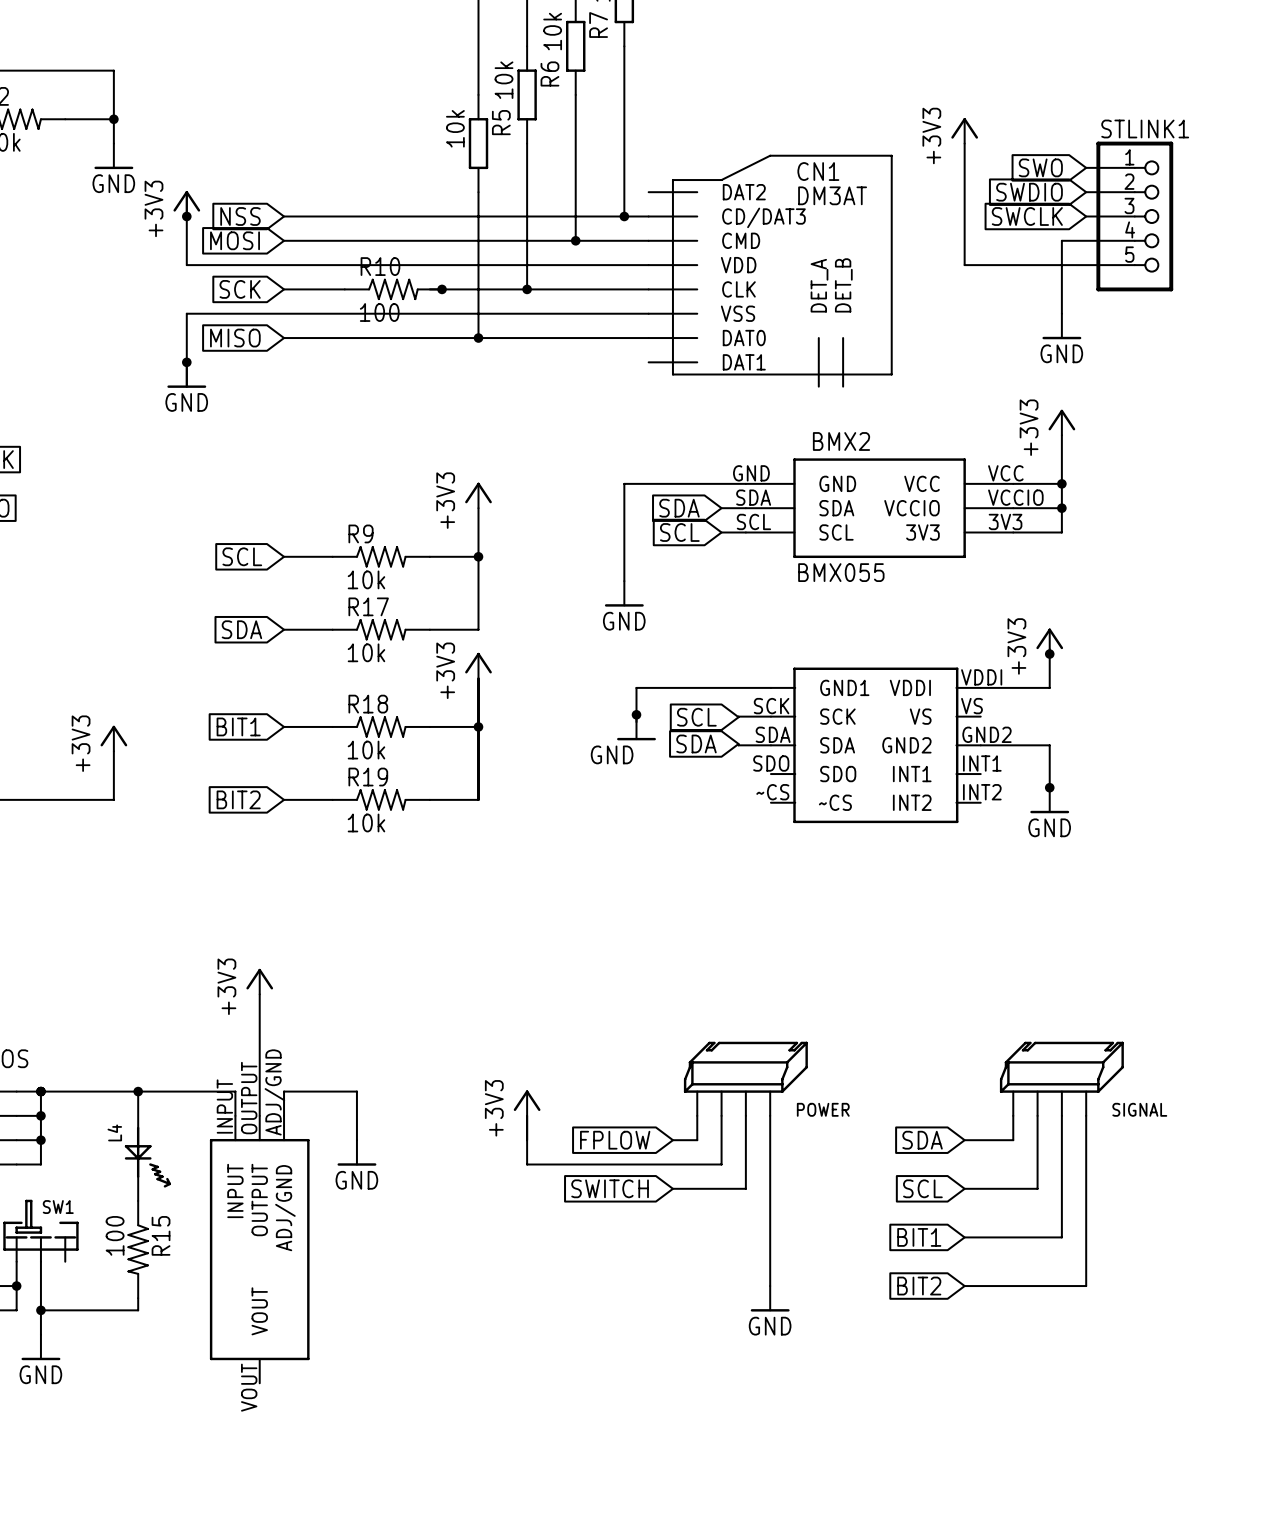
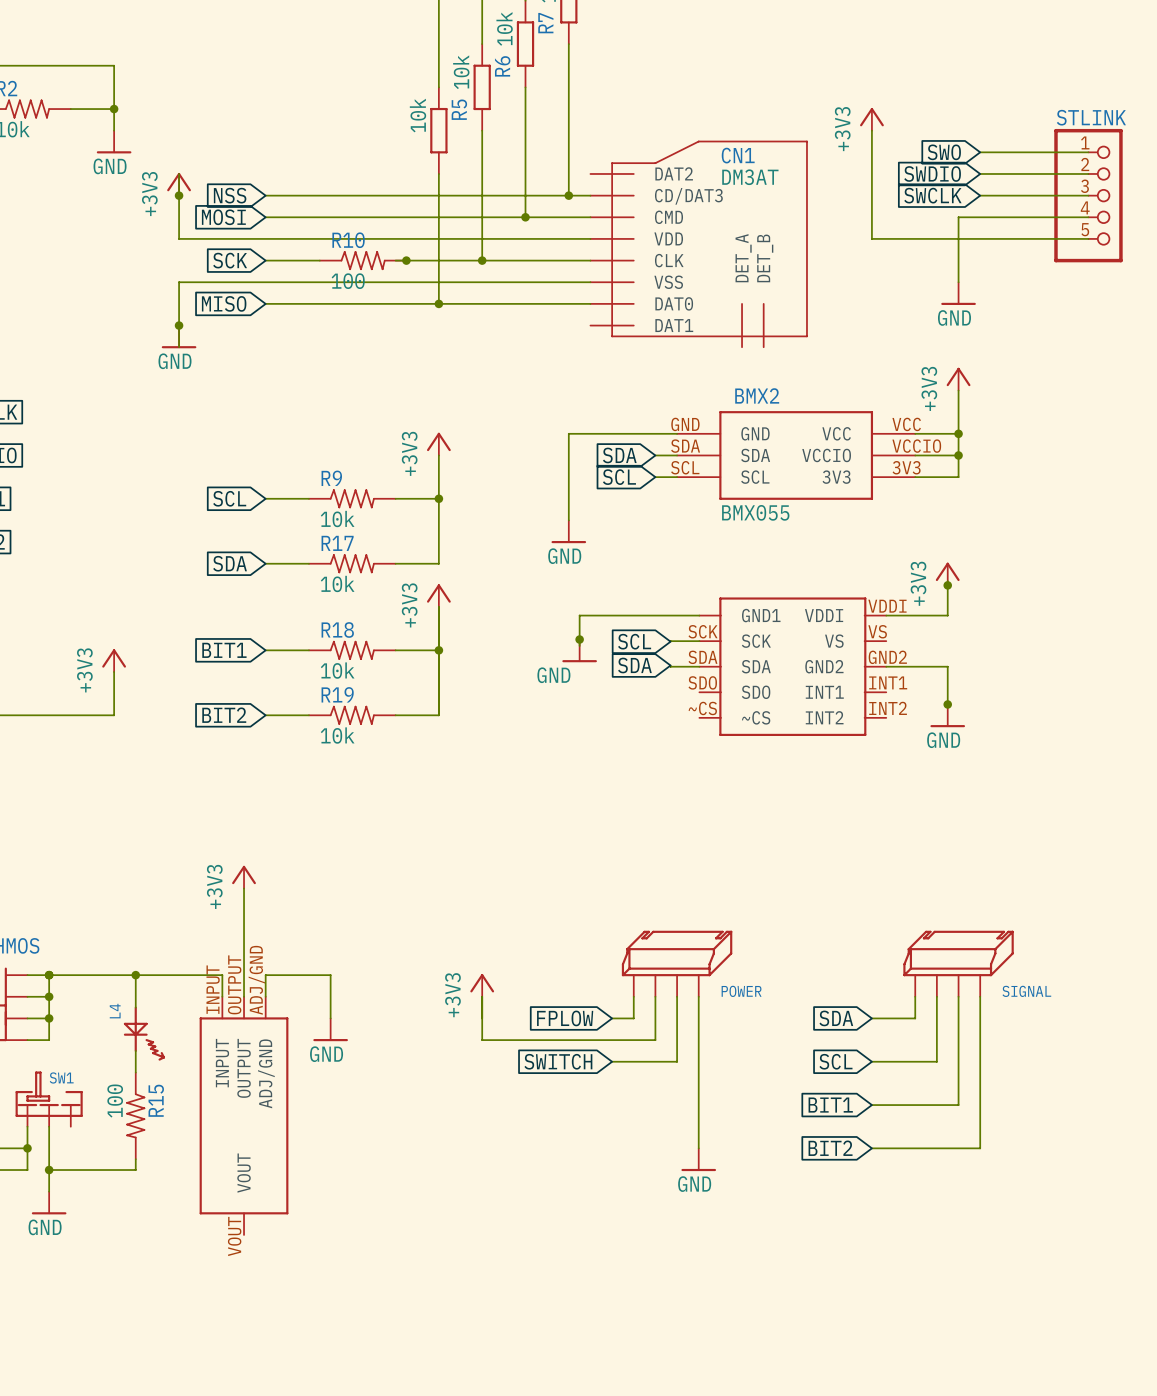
wire: none -> (1023, 152) (1088, 152)
wire: none -> (1023, 173) (1088, 173)
wire: none -> (1023, 195) (1088, 195)
STLINK1: (1134, 216) -> none
STLINK: none -> (1088, 195)
wire: none -> (1023, 217) (1088, 217)
wire: none -> (1023, 238) (1088, 238)

